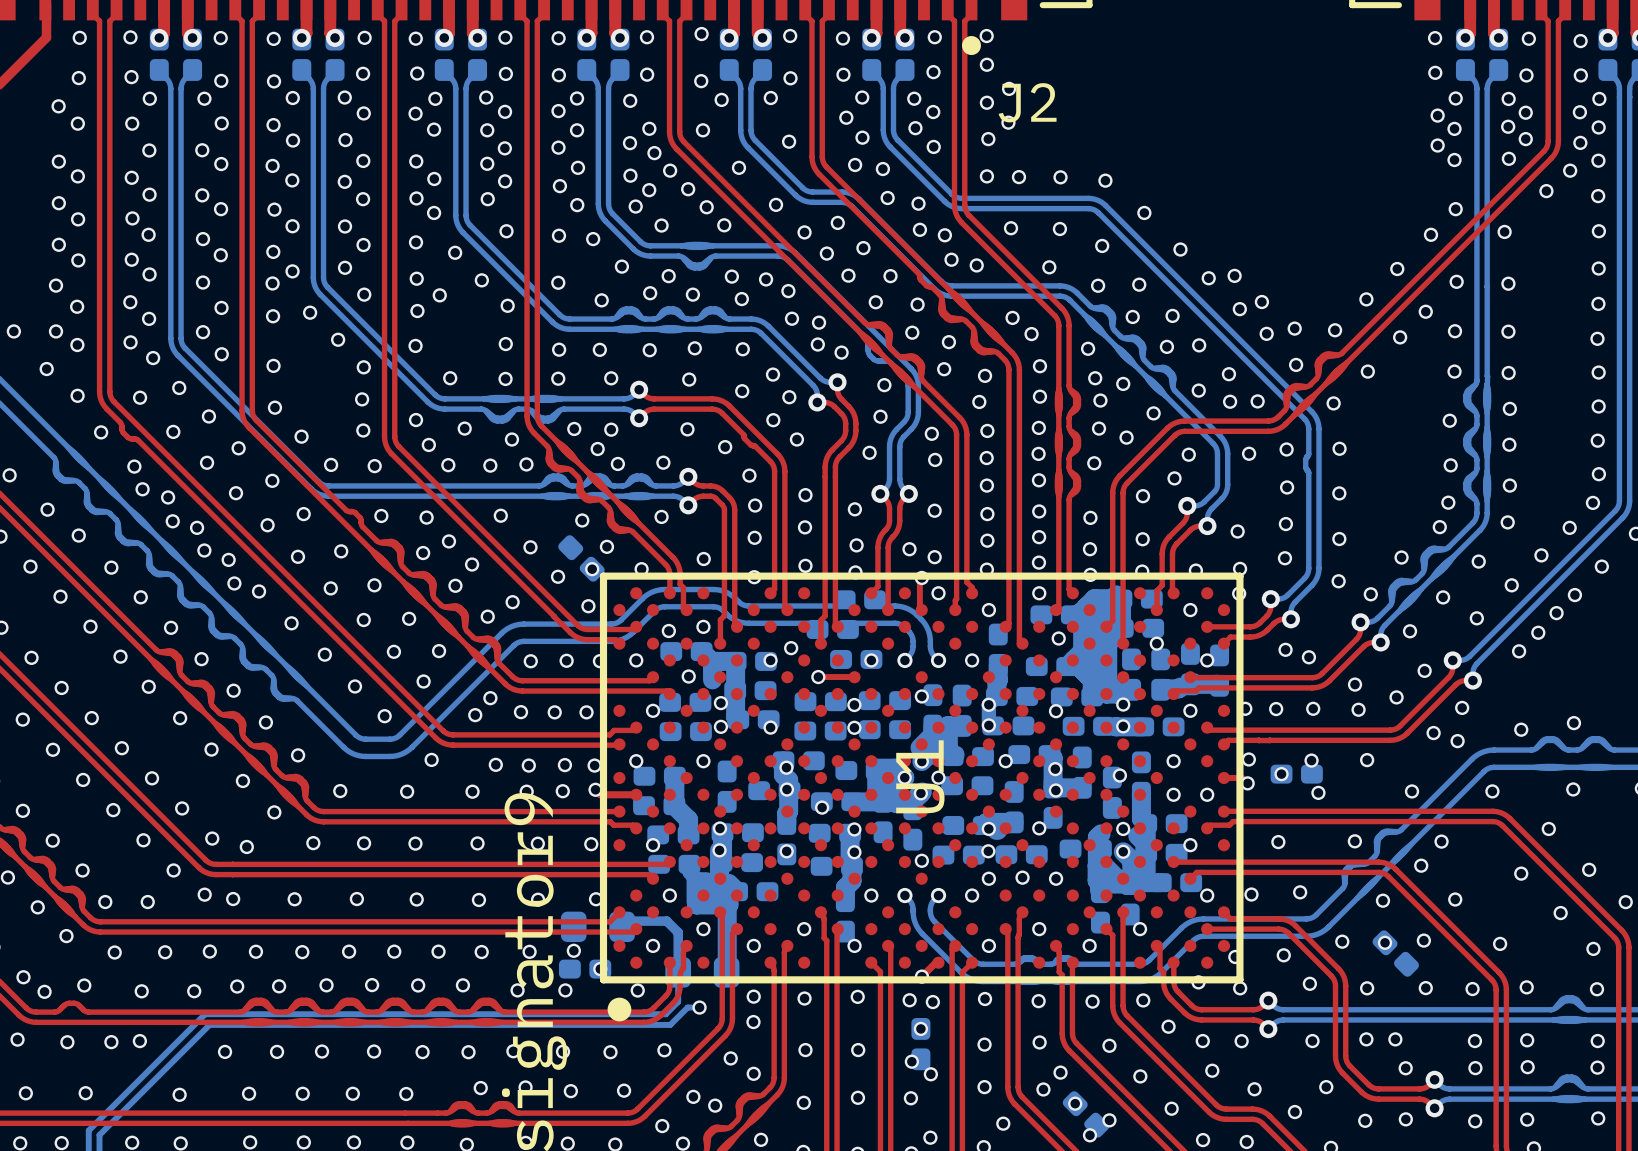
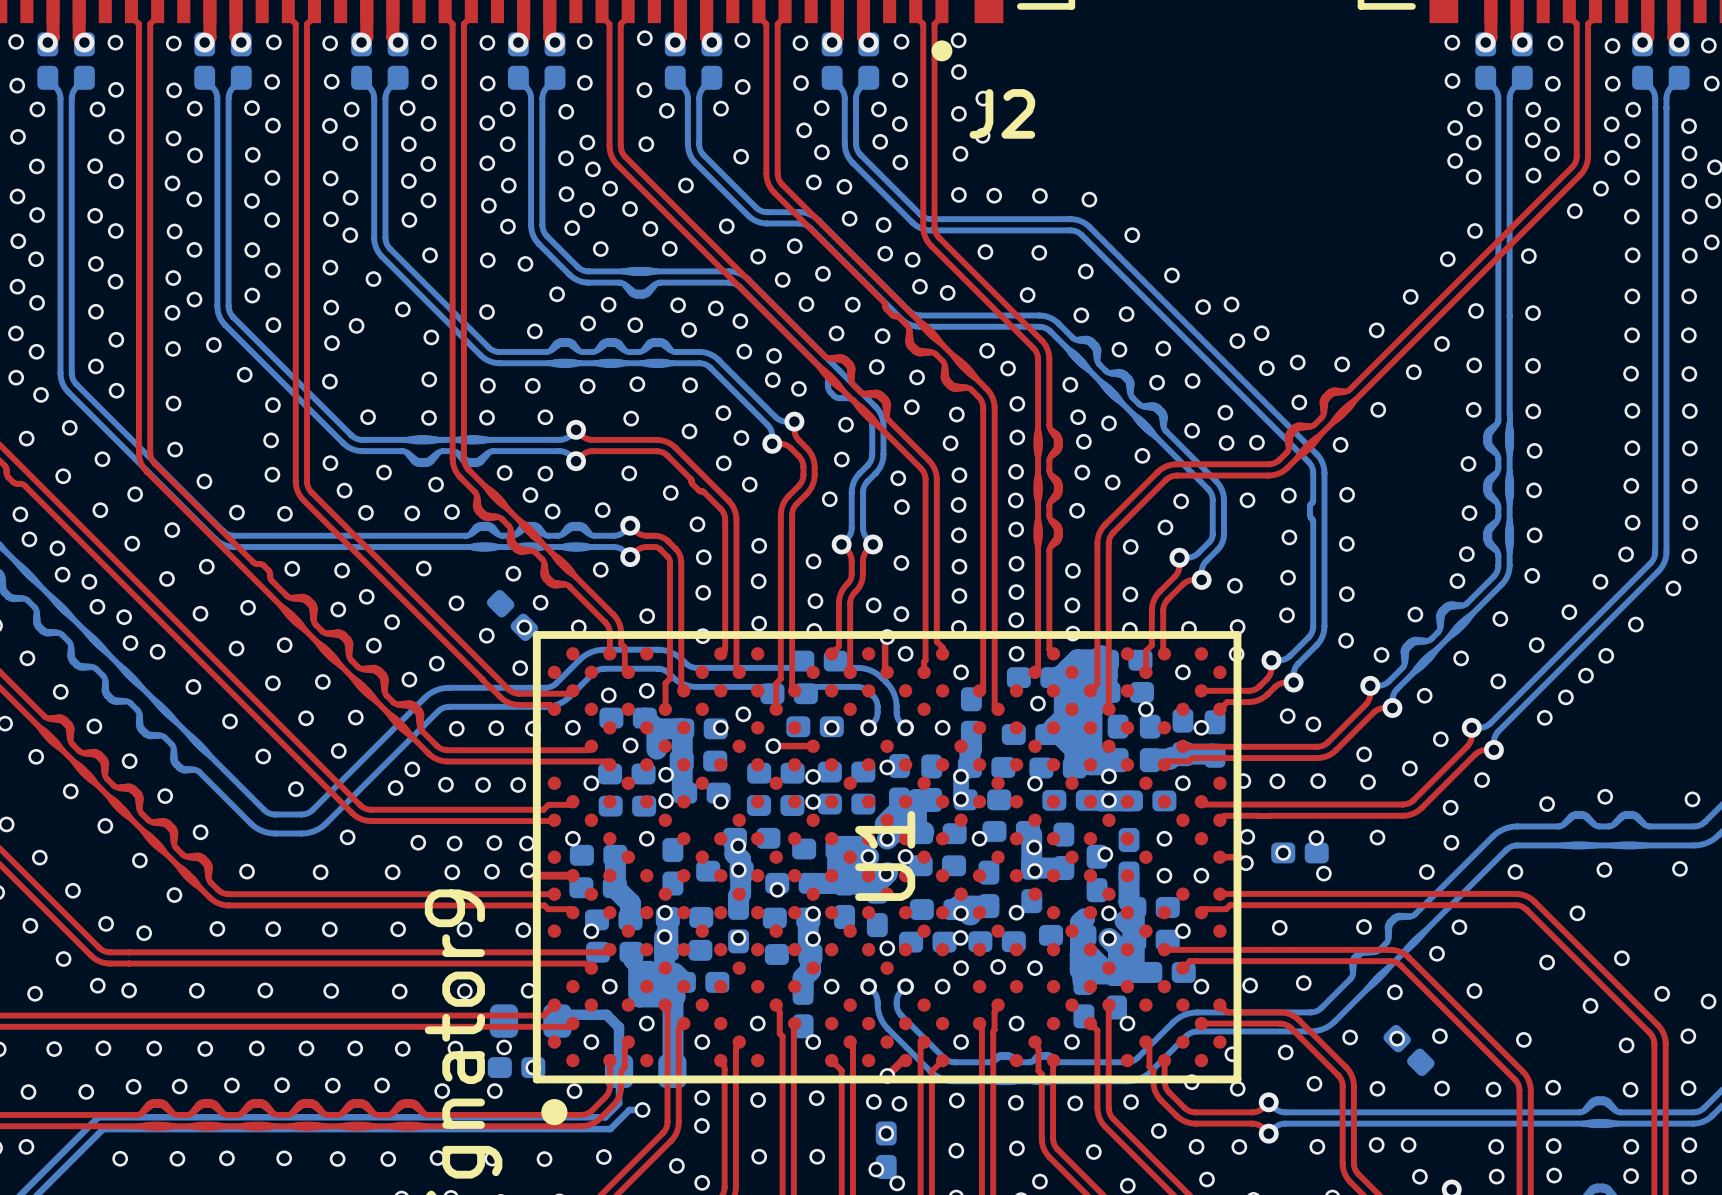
via position: (1457, 741) -> (1451, 842)

